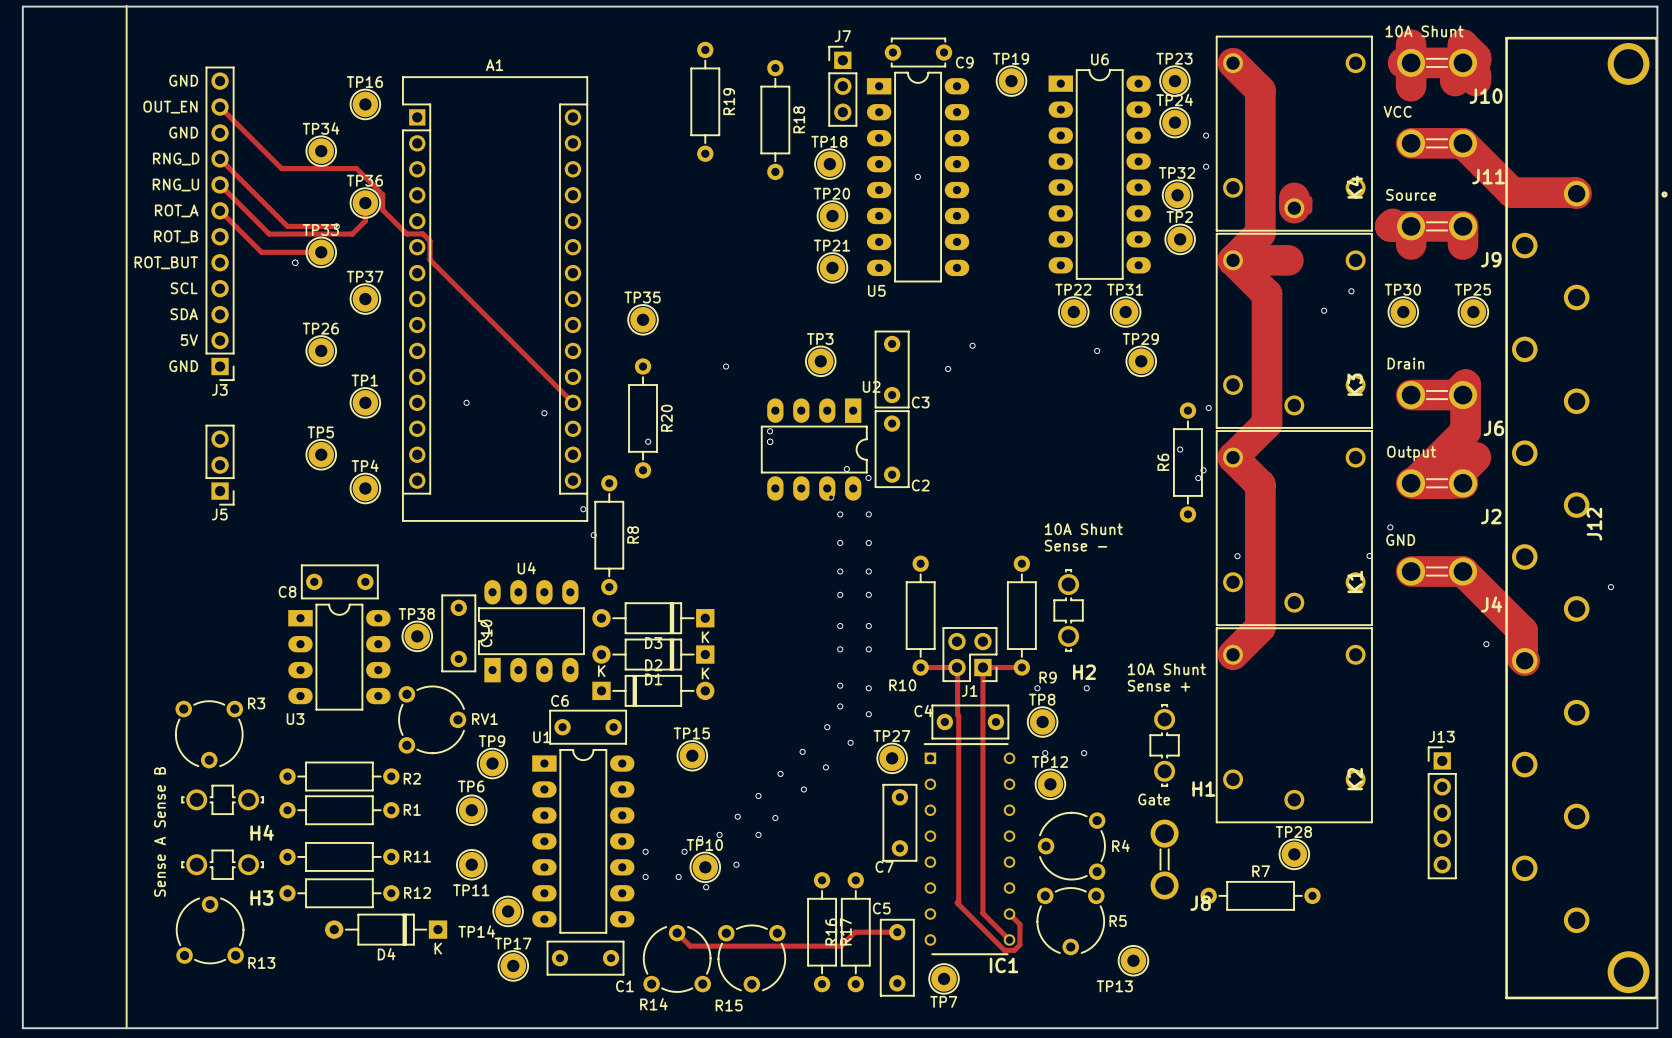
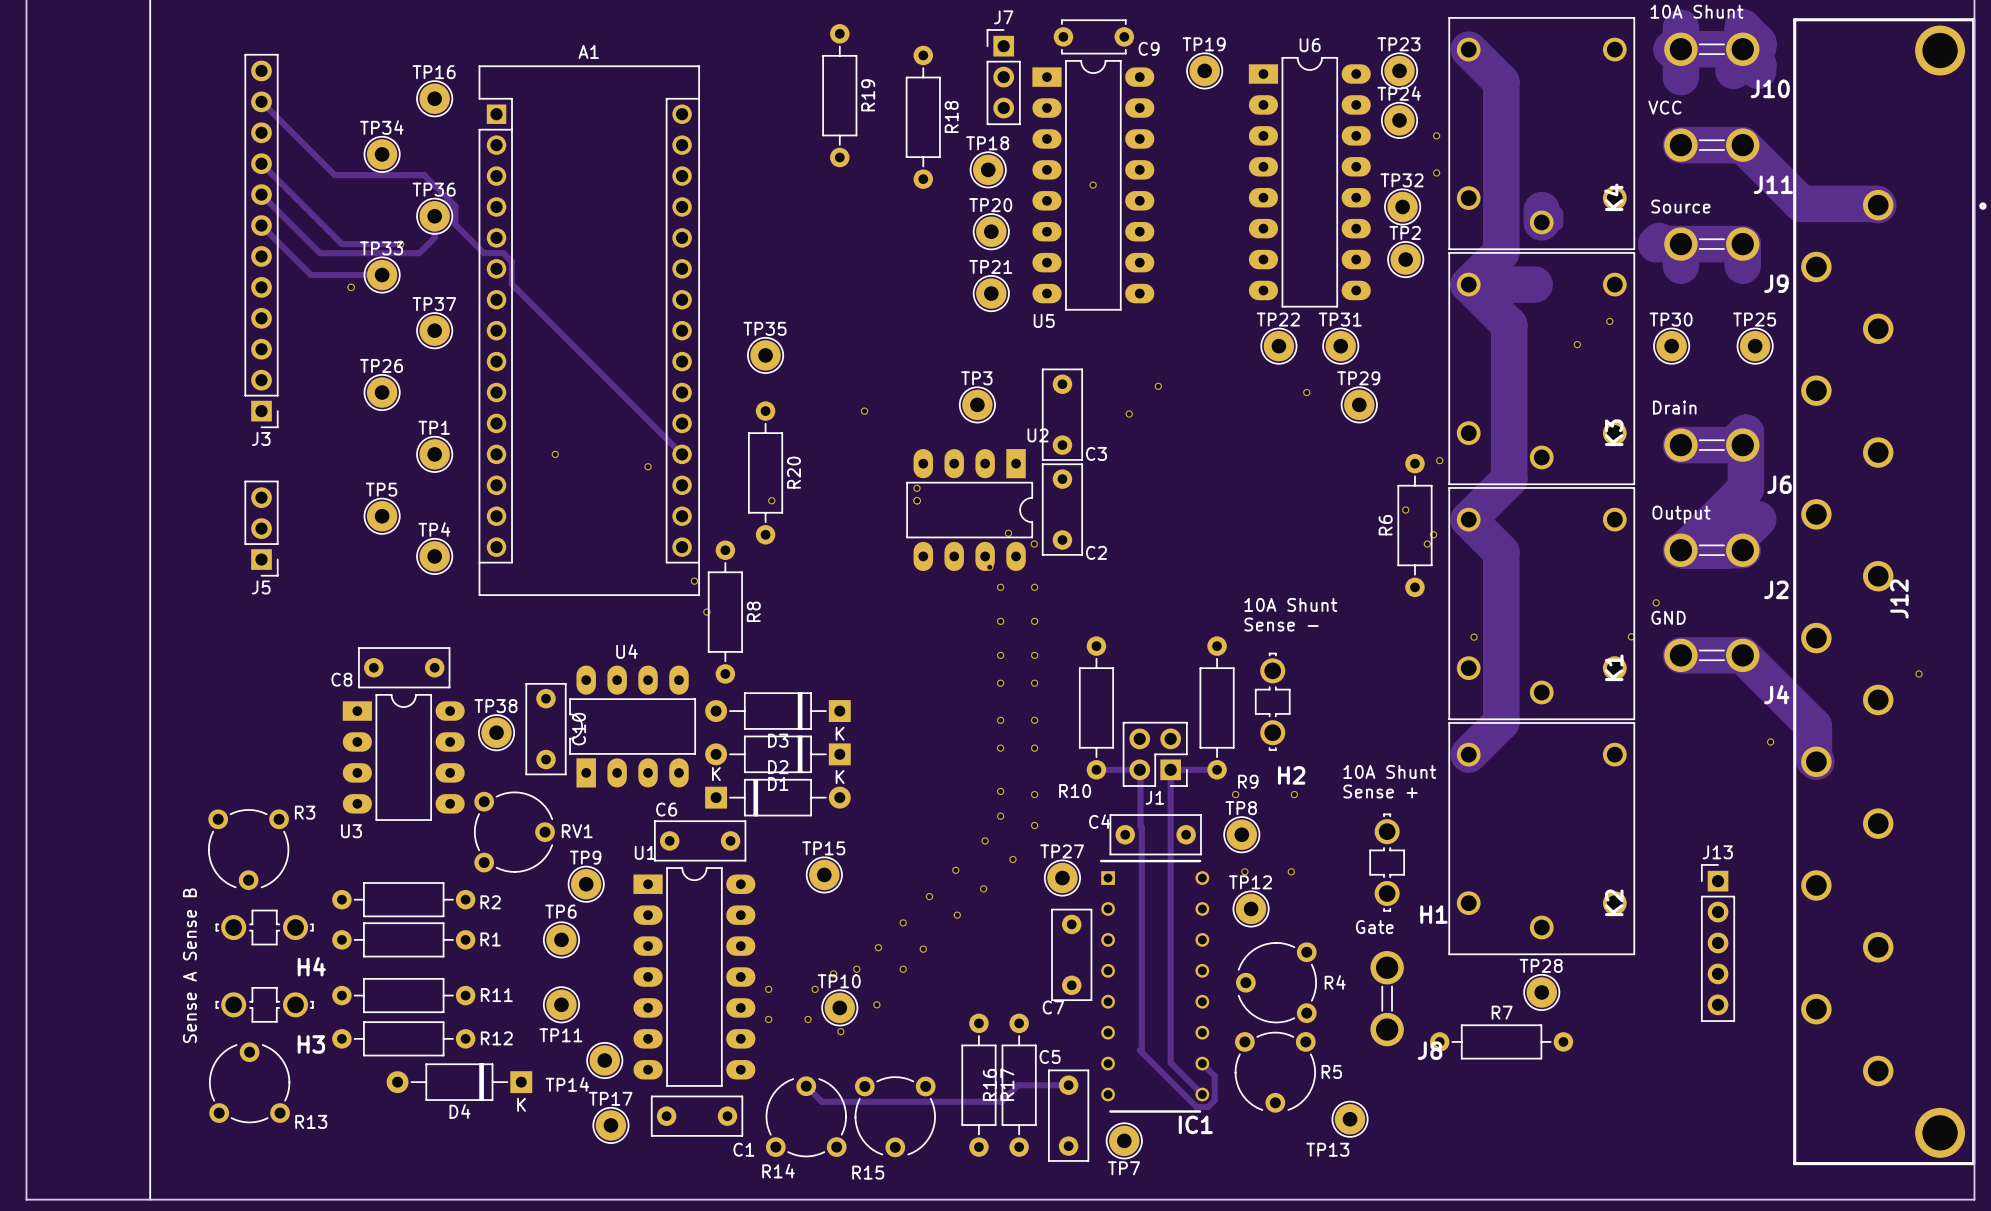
text: GND (183, 80) -> none
text: OUT_EN (170, 107) -> none
text: GND (183, 132) -> none
text: RNG_D (176, 159) -> none
text: RNG_U (175, 184) -> none
text: ROT_A (176, 210) -> none
text: ROT_B (176, 236) -> none
text: ROT_BUT (166, 262) -> none
text: SCL (184, 288) -> none
text: SDA (184, 314) -> none
text: 5V (189, 340) -> none
text: GND (183, 366) -> none

